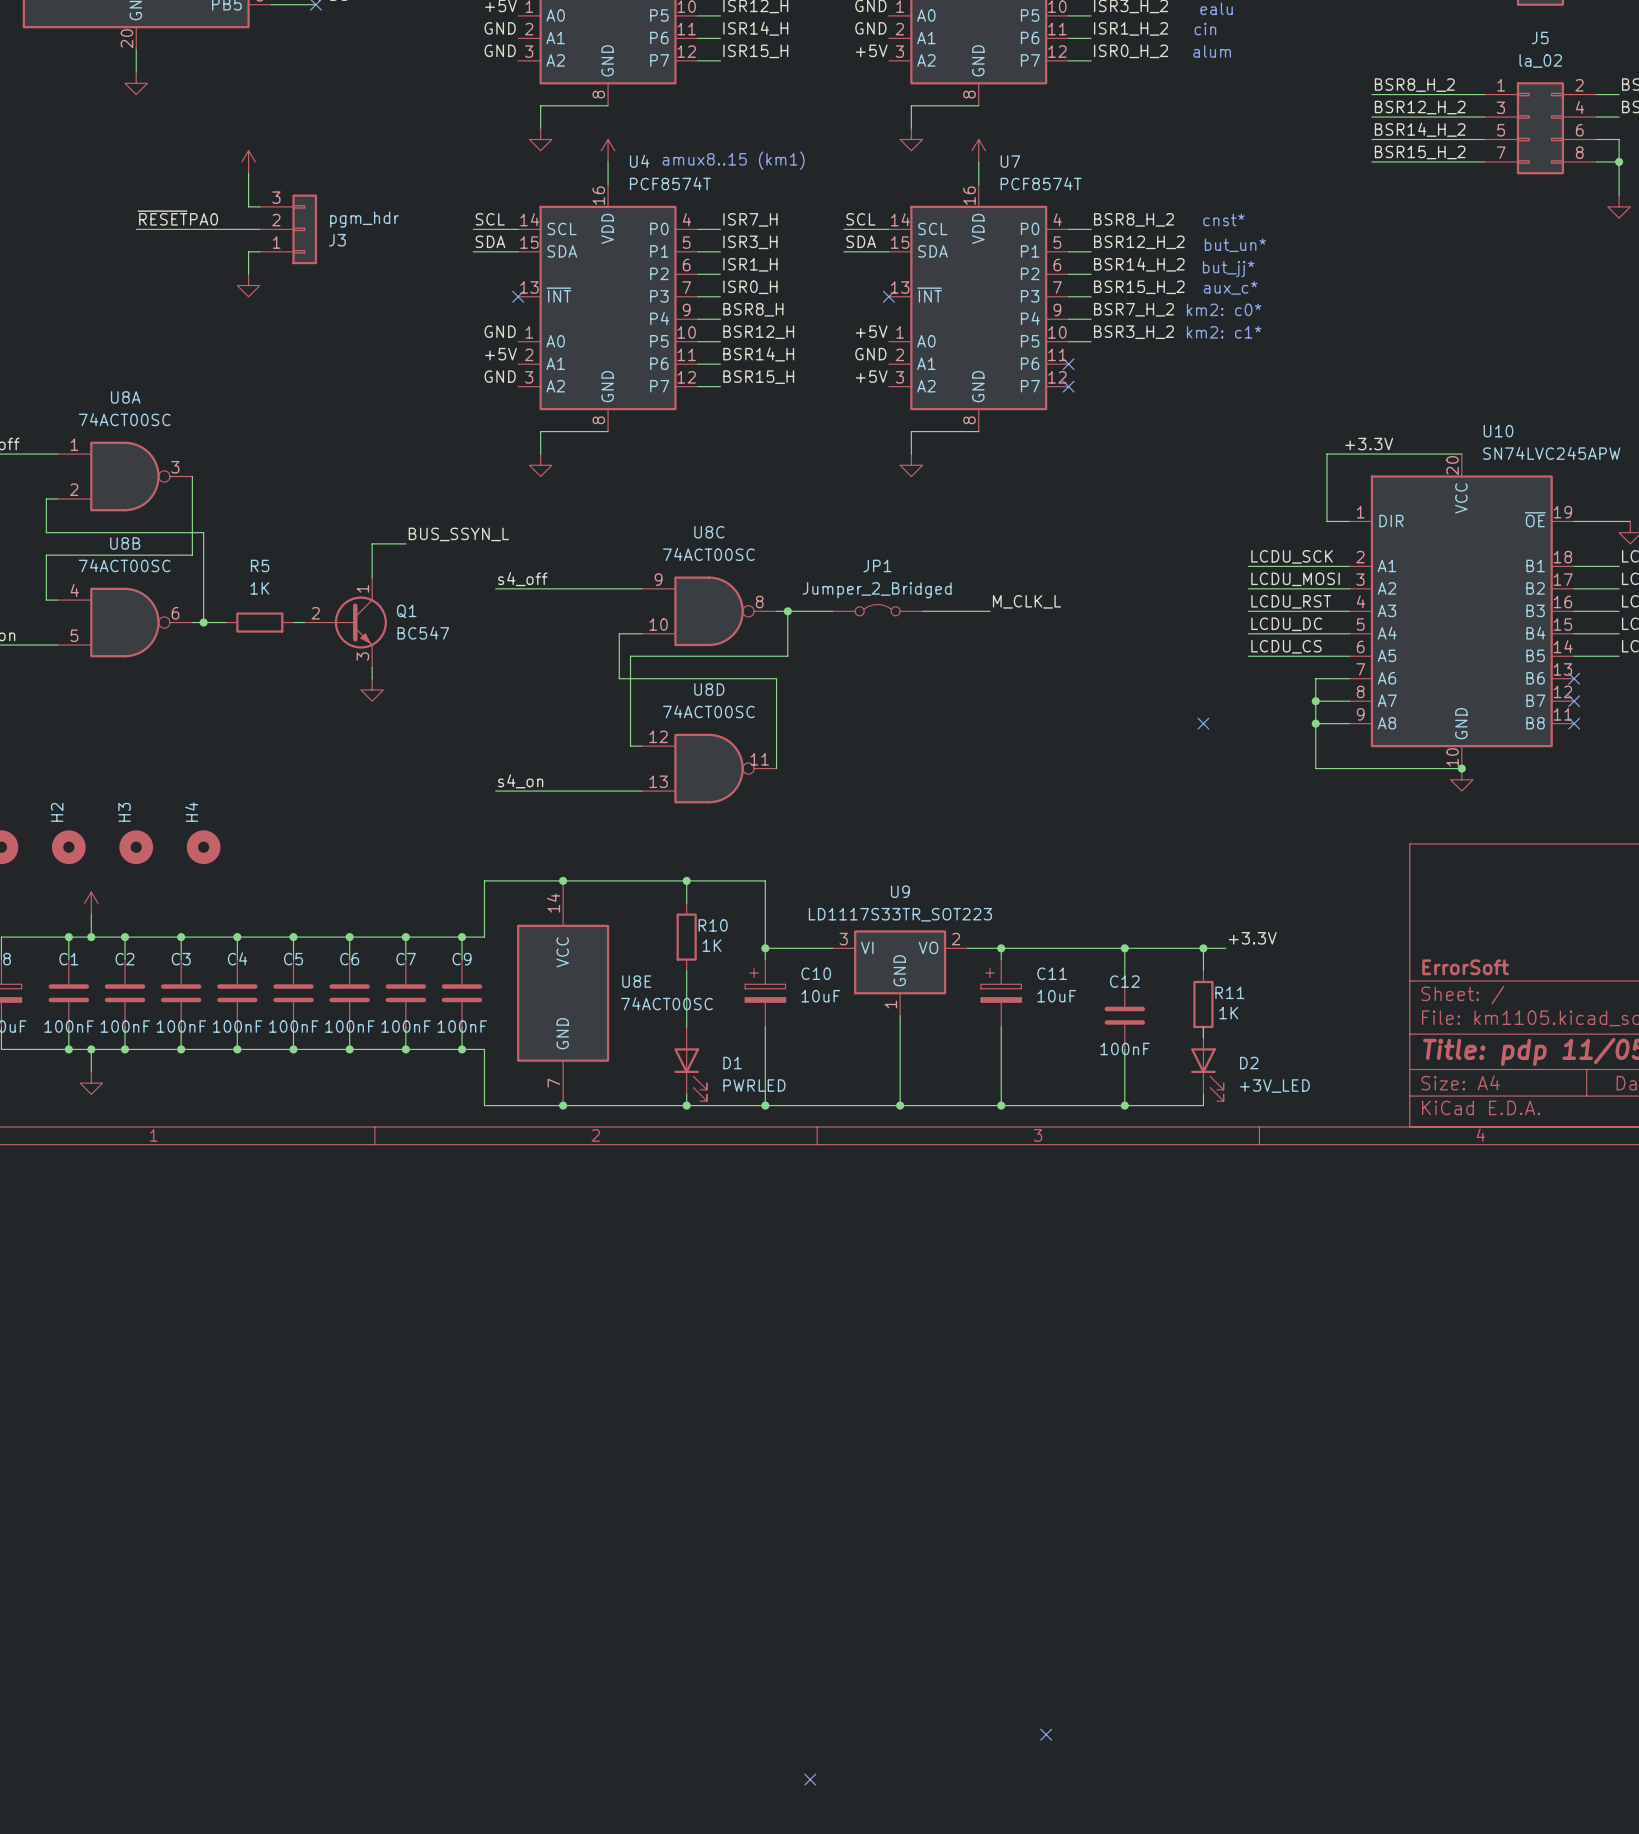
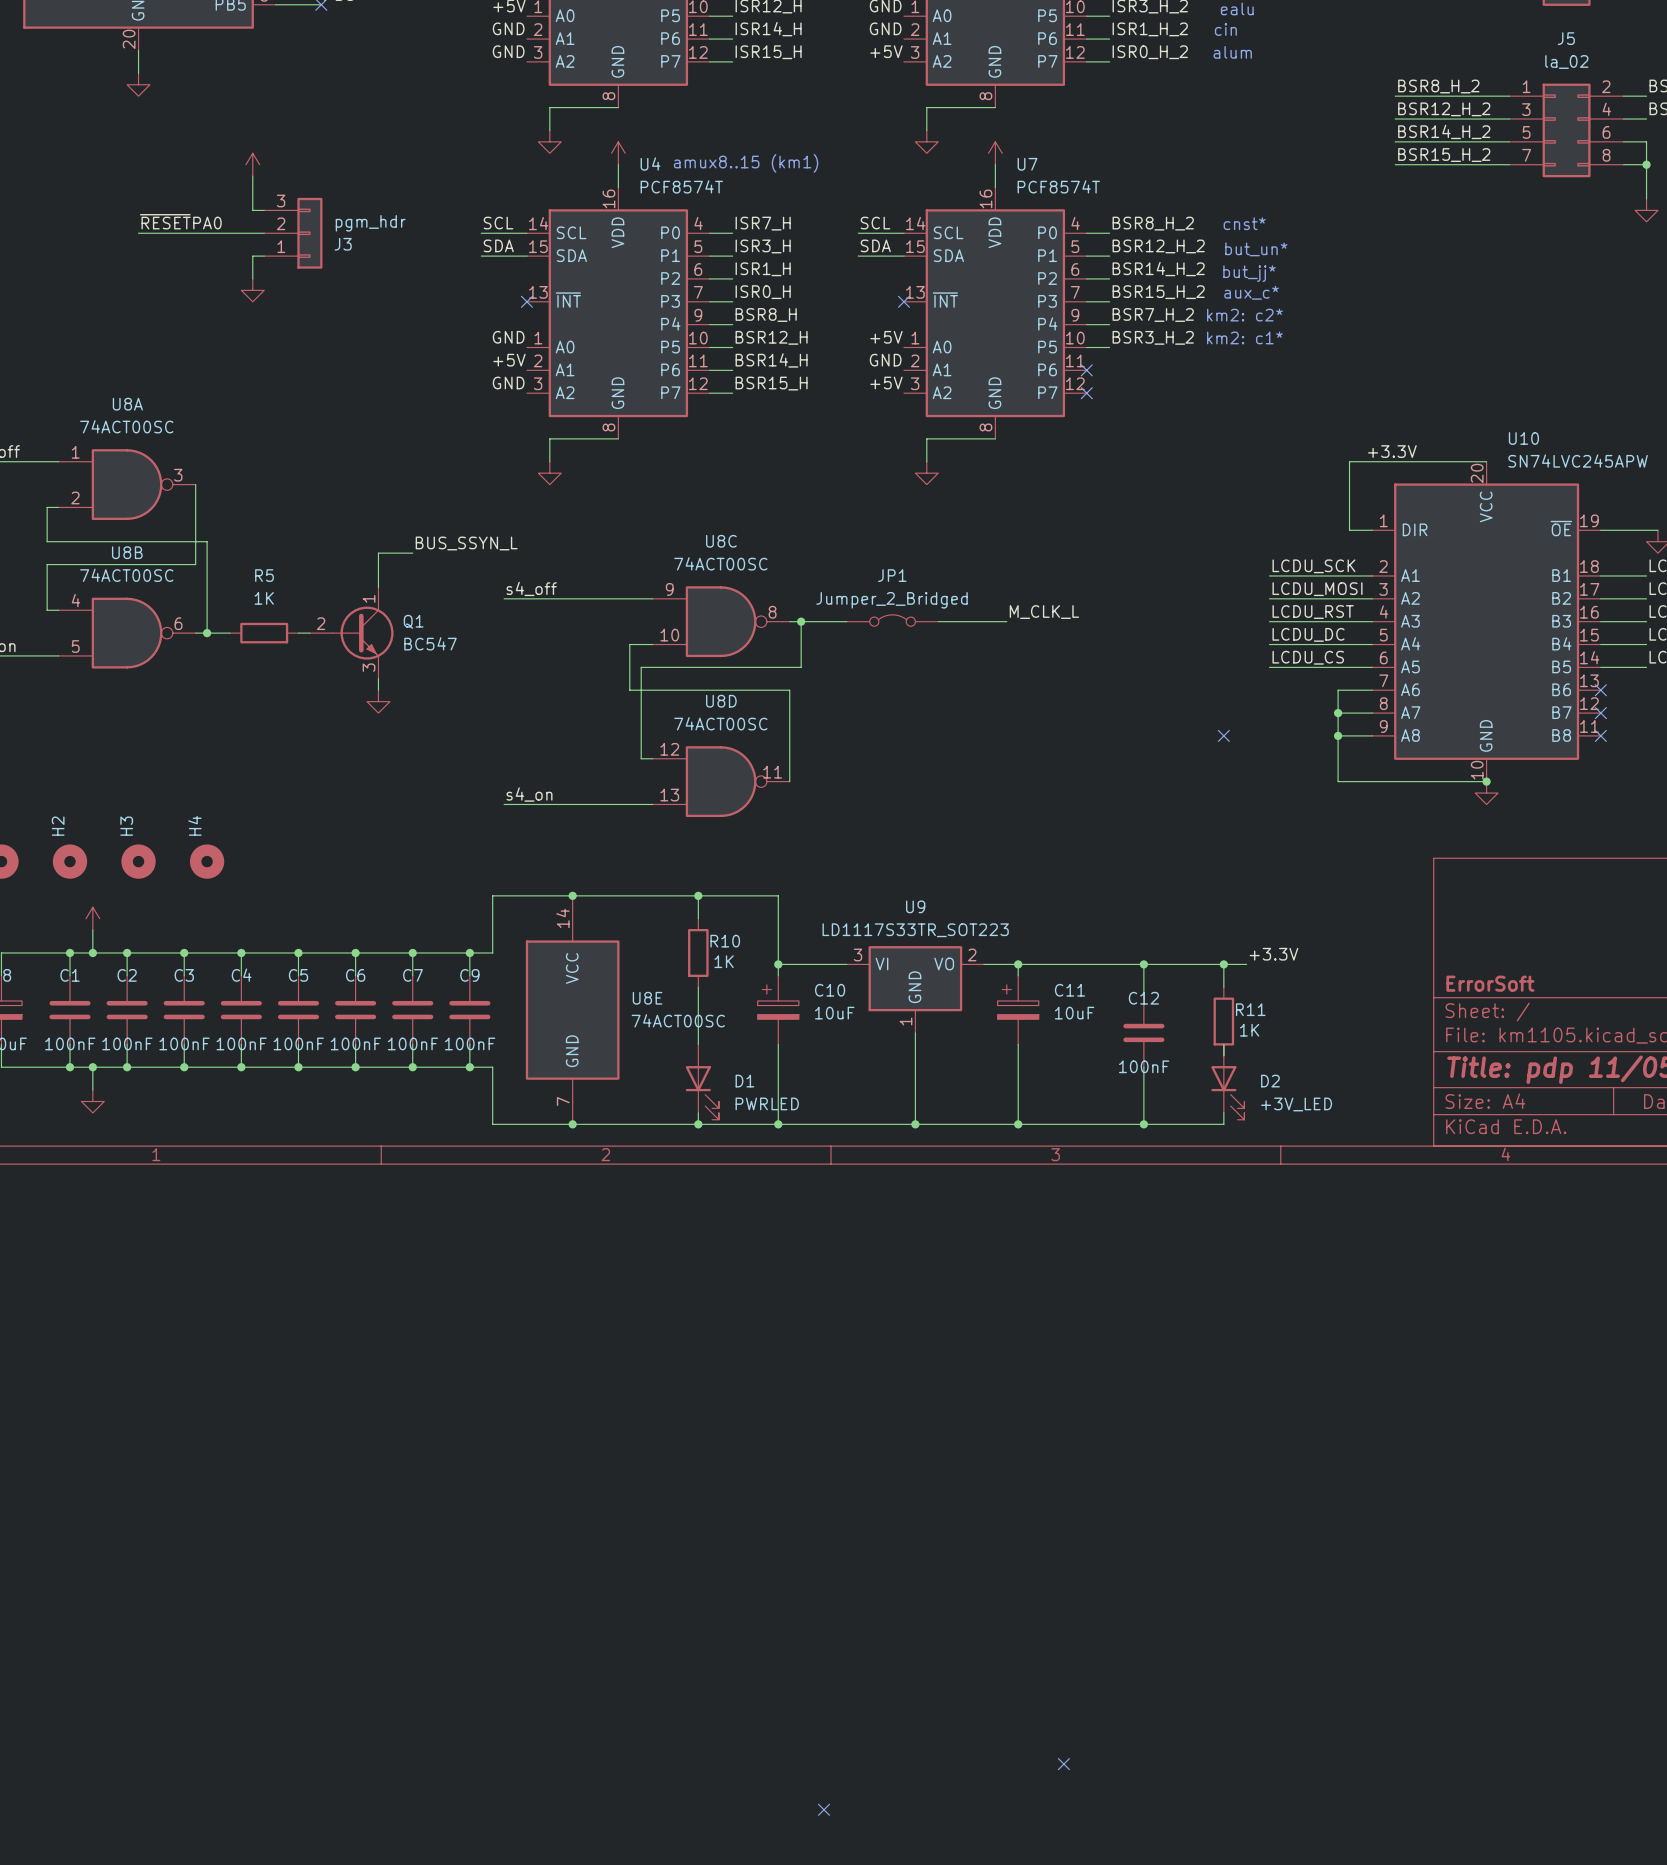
text: km2: c0* (1224, 309) -> km2: c2* (1244, 315)

